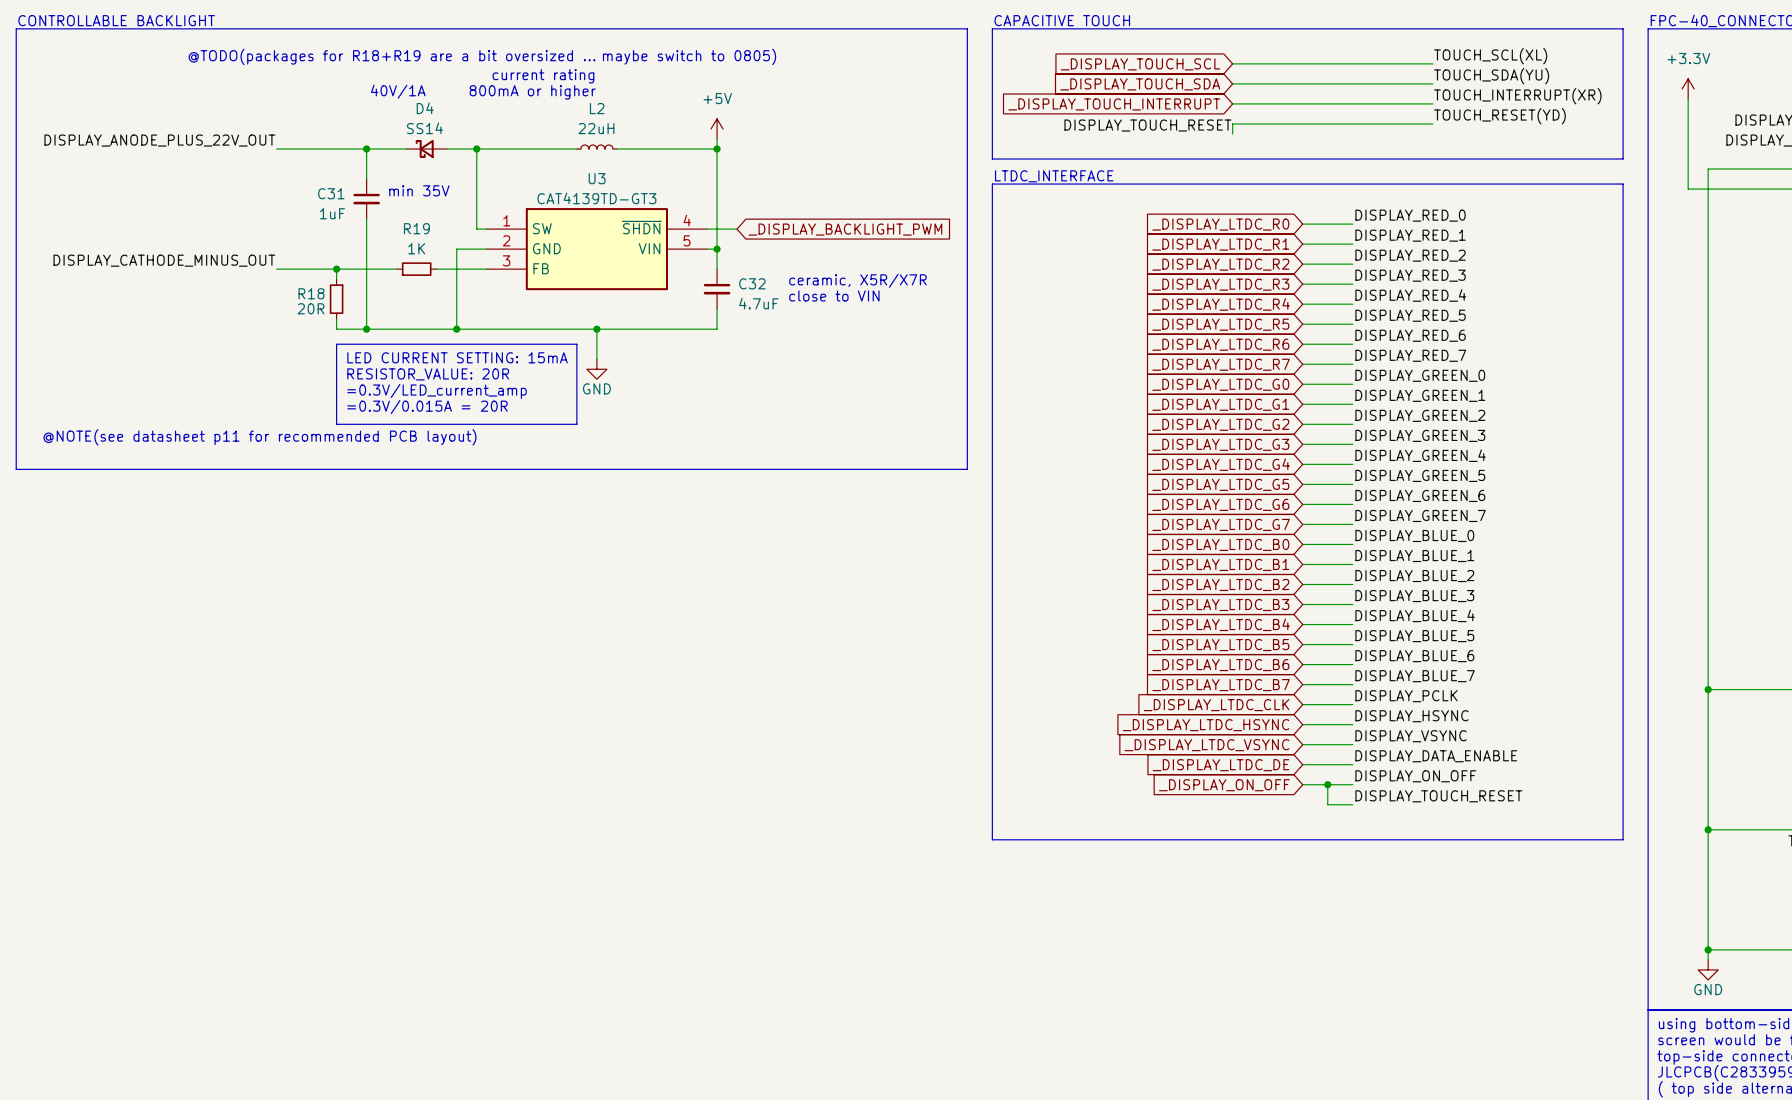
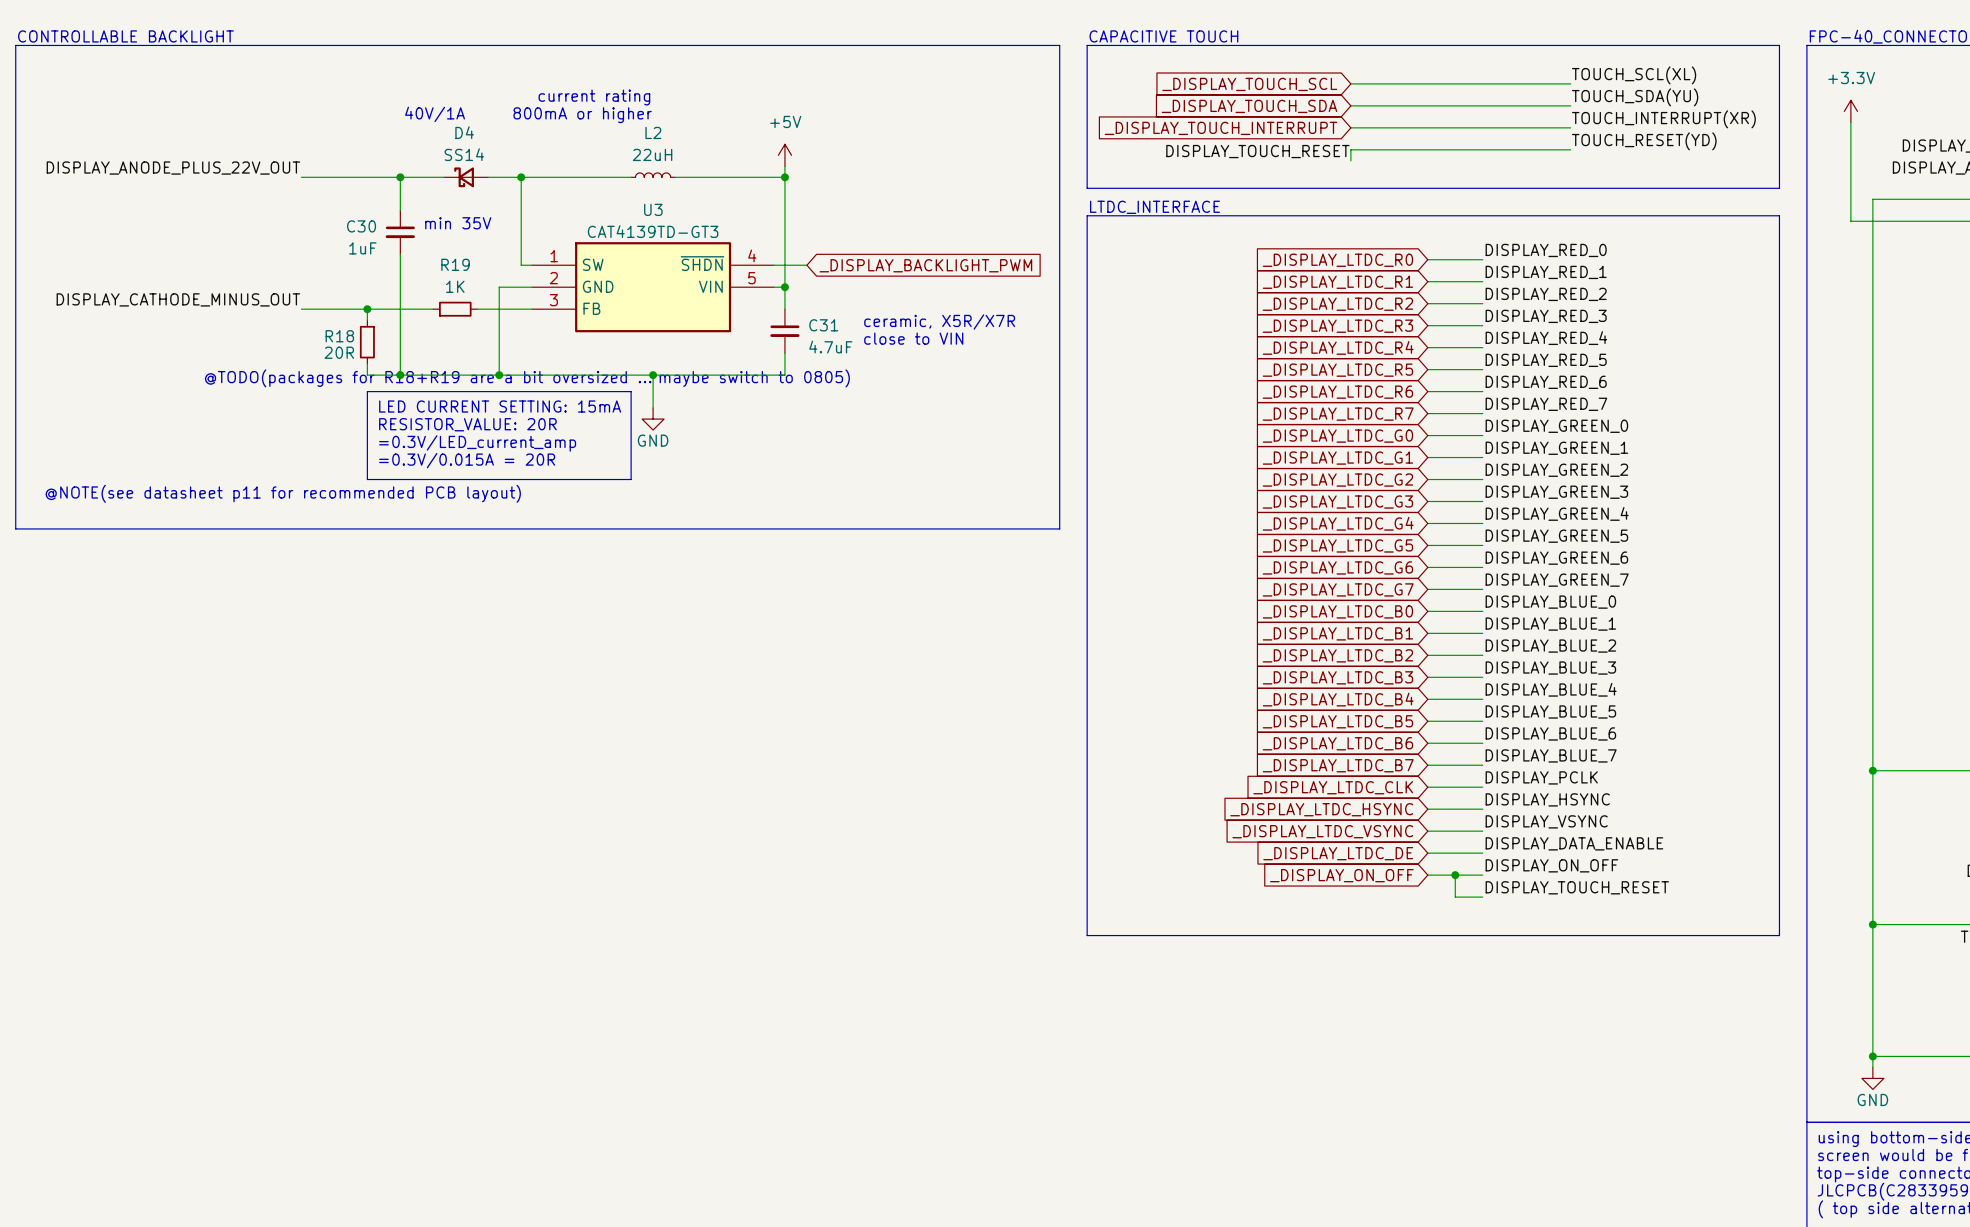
text: @TODO(packages for R18+R19 are a bit oversized … maybe switch to 0805) (482, 56) -> none
C31 name: C31 (331, 193) -> C30 (361, 226)
C32 name: C32 (752, 283) -> C31 (823, 325)
text: none -> @TODO(packages for R18+R19 are a bit oversized … maybe switch to 0805) (527, 378)

